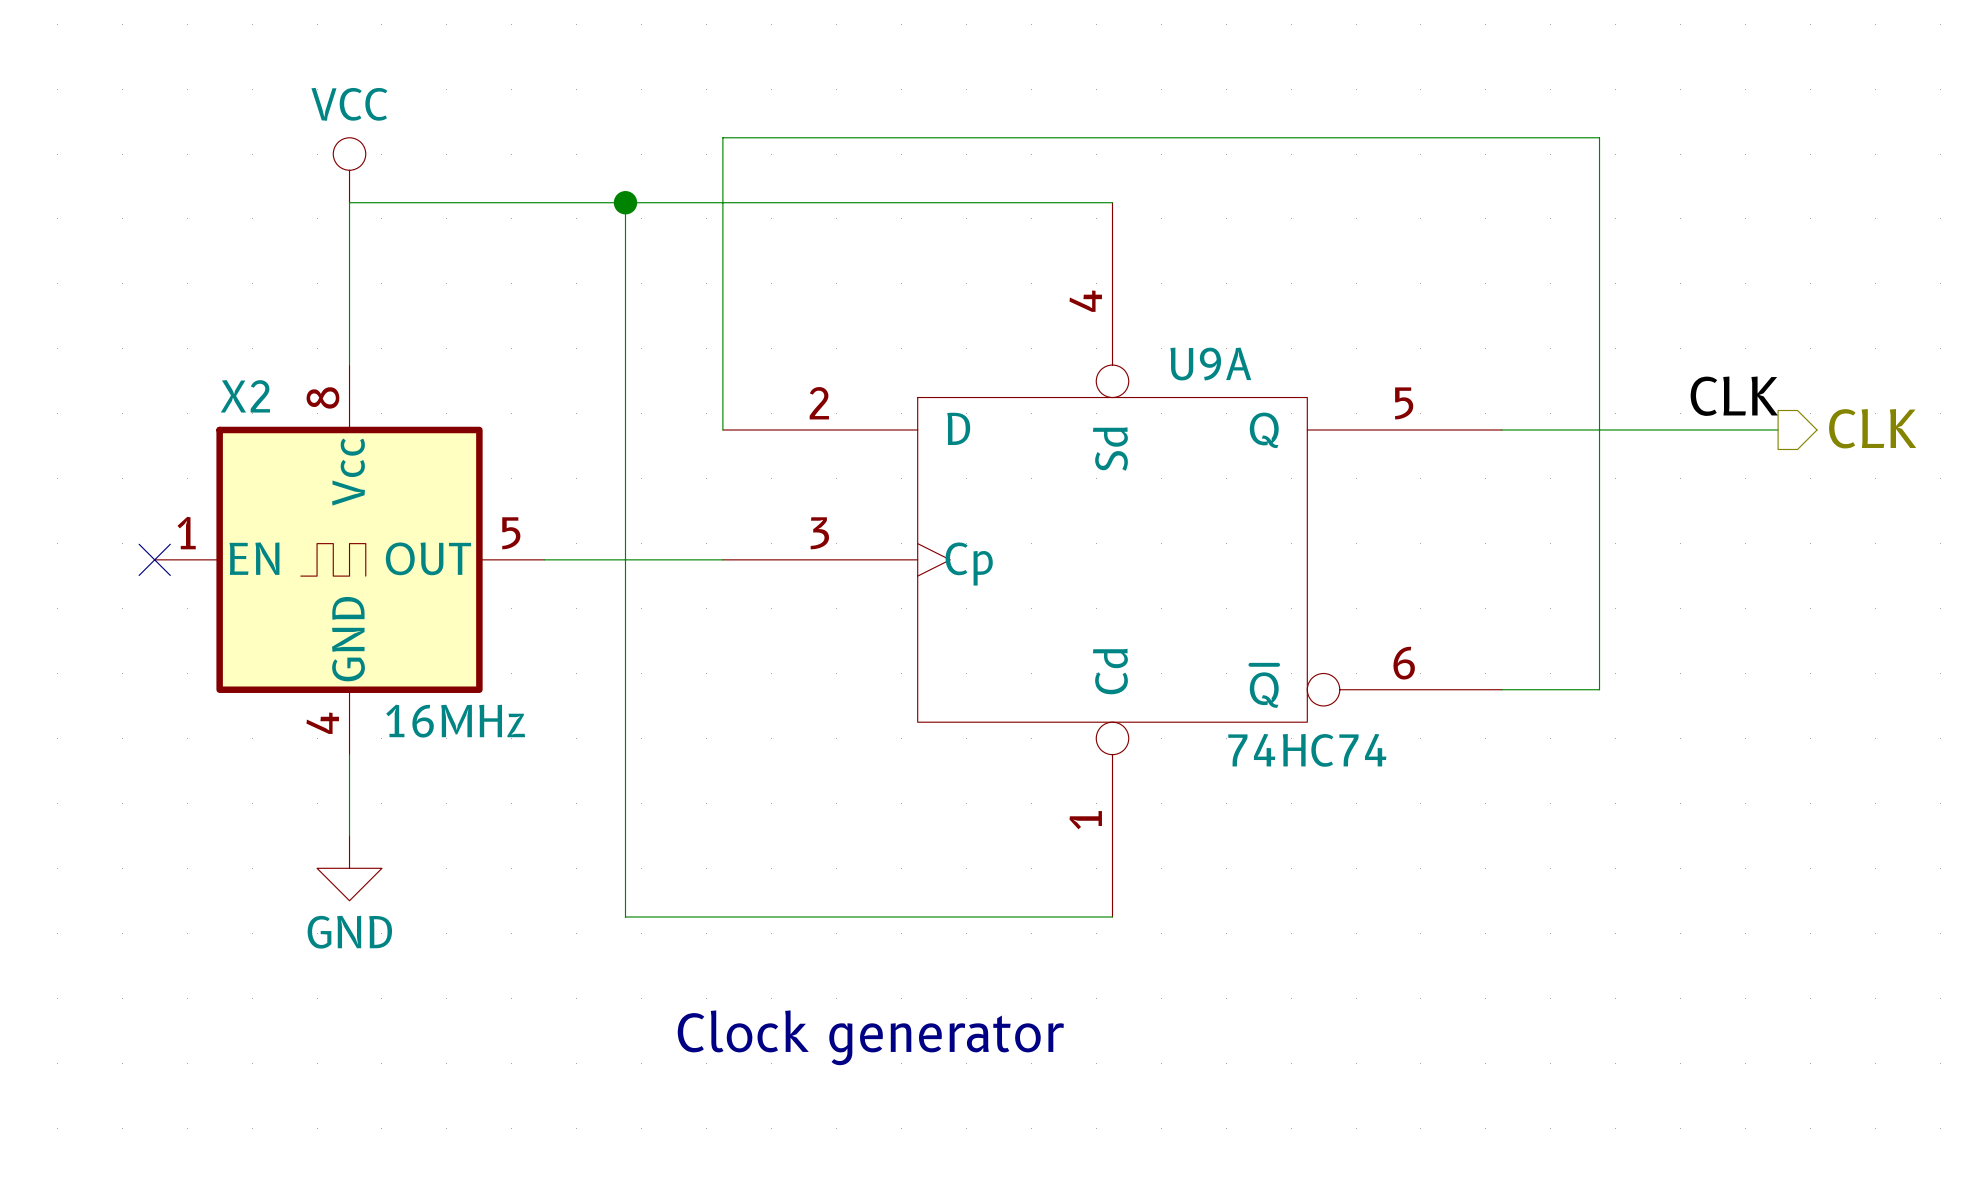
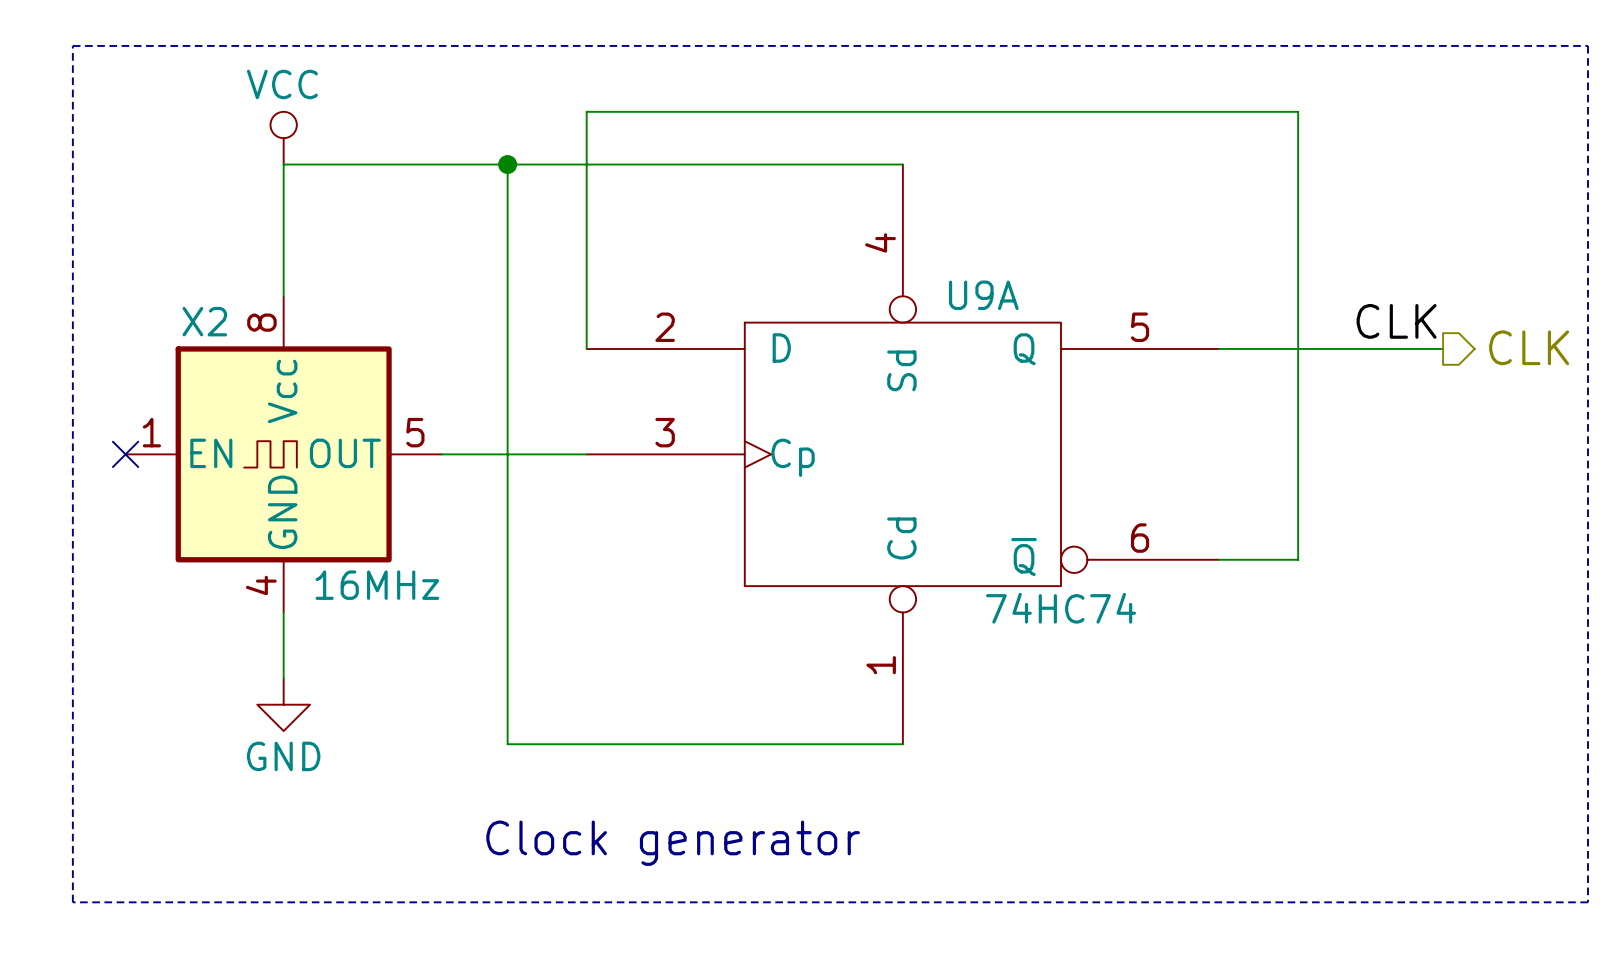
line: none -> (72, 45) (1588, 45) (1588, 902) (72, 902) (72, 45)

